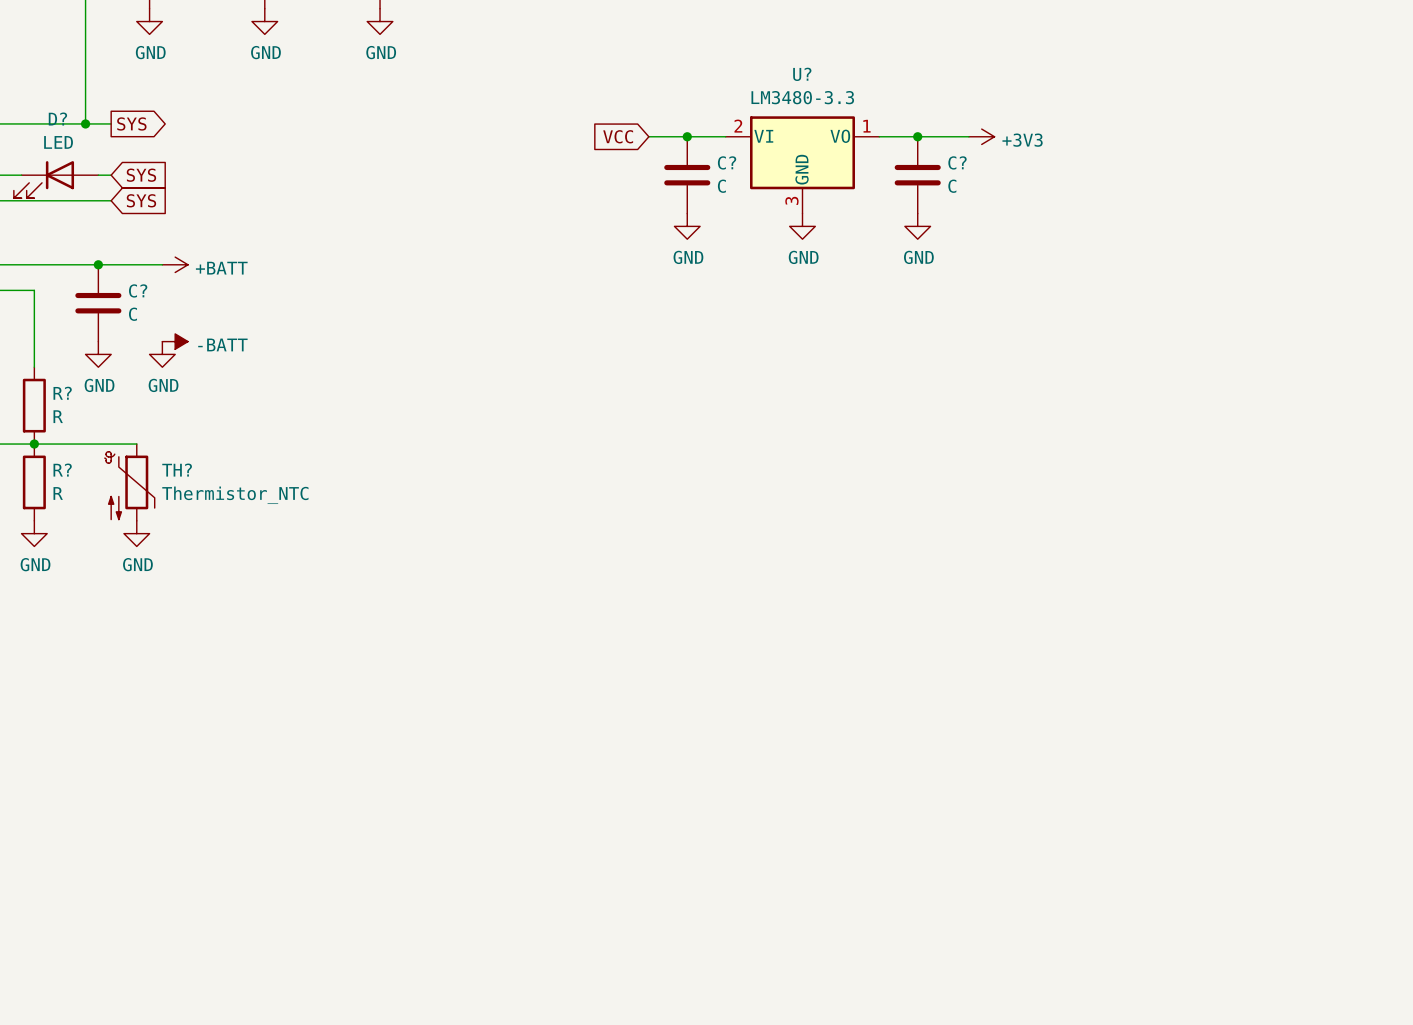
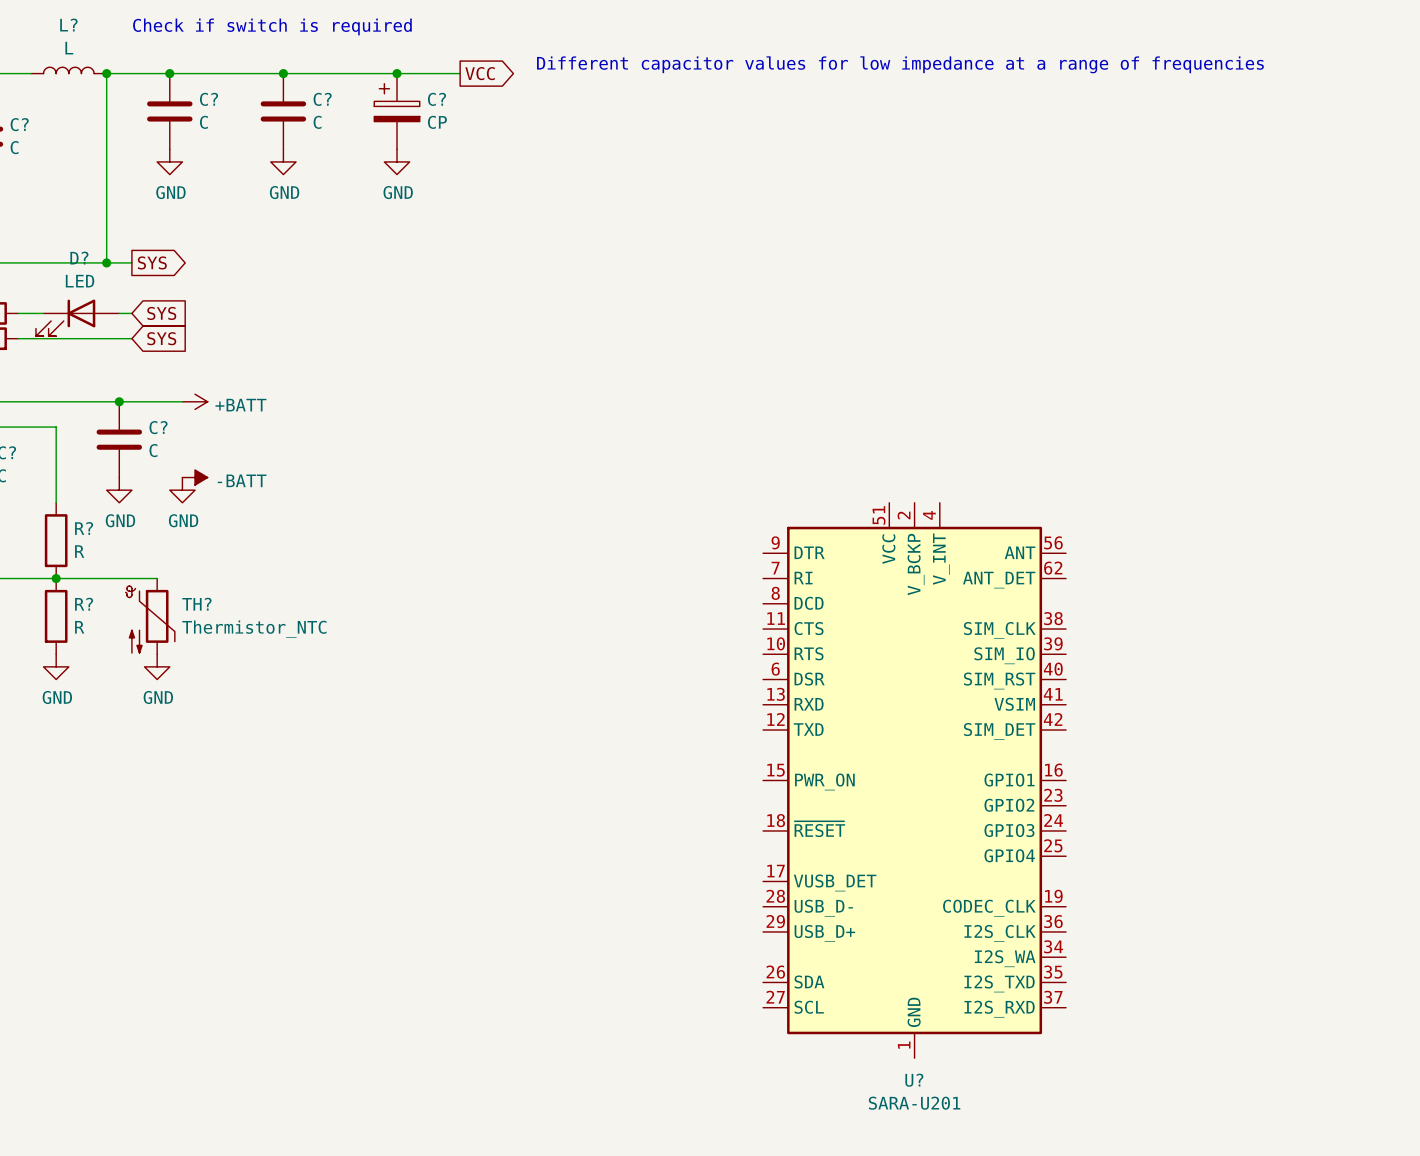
global label: VCC (618, 136) -> none
wire: (648, 136) (725, 136) -> none
junction: (687, 136) -> none
wire: (879, 136) (968, 136) -> none
junction: (917, 136) -> none
power symbol: +3V3 (981, 136) -> none
U?: LM3480-3.3 (802, 164) -> none
C?: C (687, 175) -> none
C?: C (917, 175) -> none
power symbol: GND (687, 226) -> none
power symbol: GND (802, 226) -> none
power symbol: GND (917, 226) -> none
U?: none -> SARA-U201 (914, 780)

